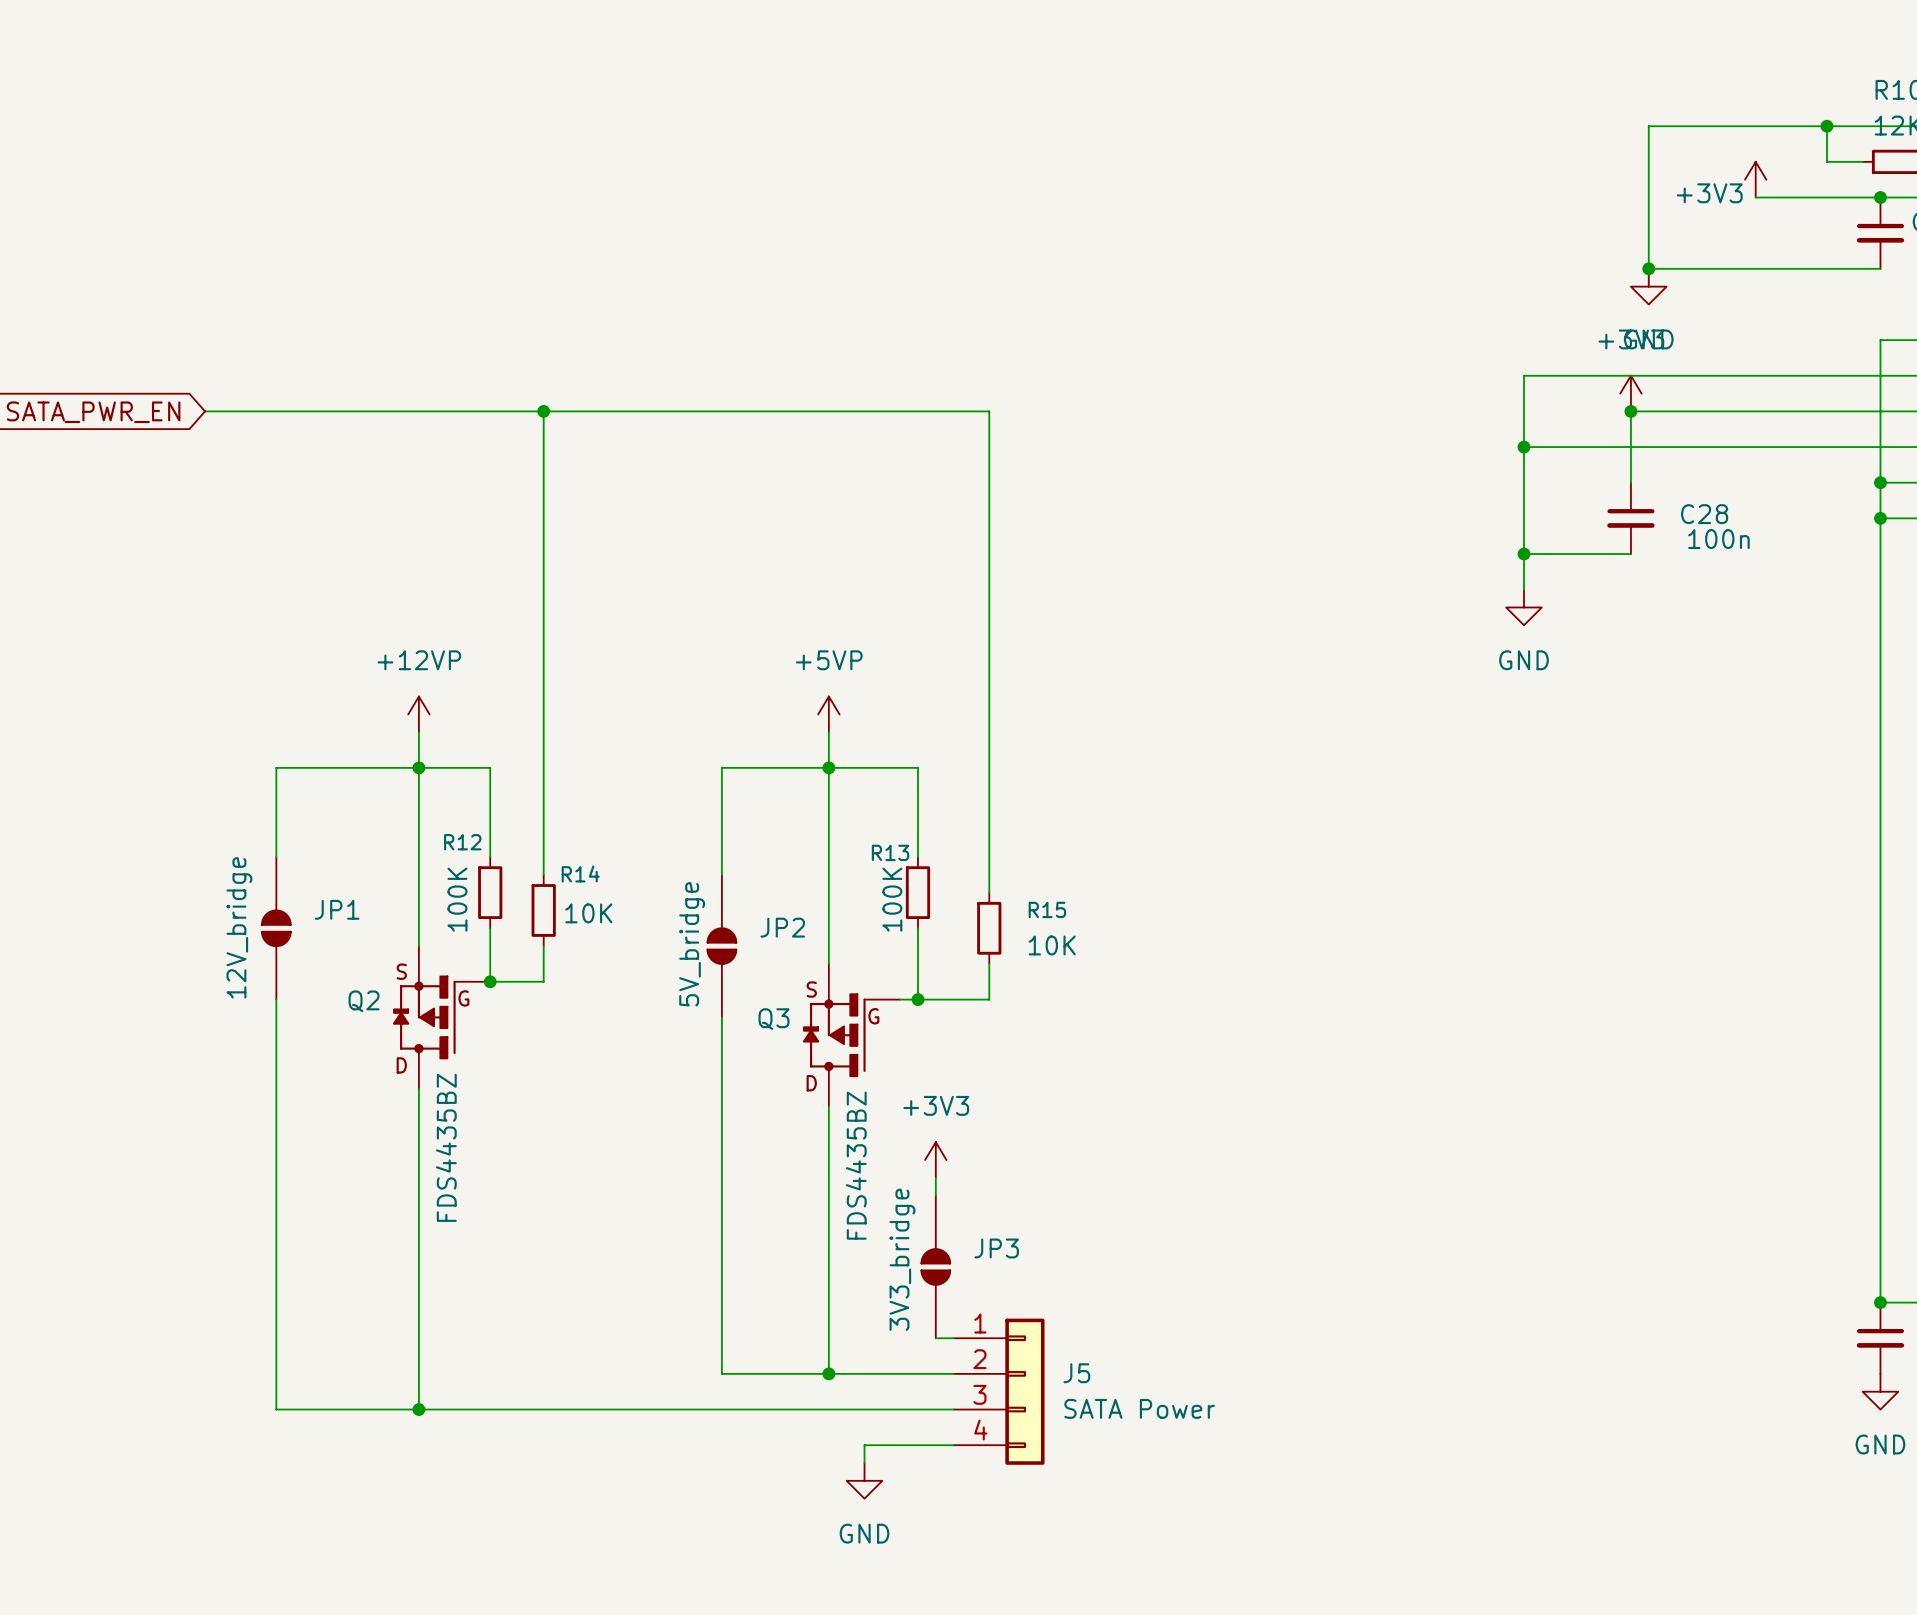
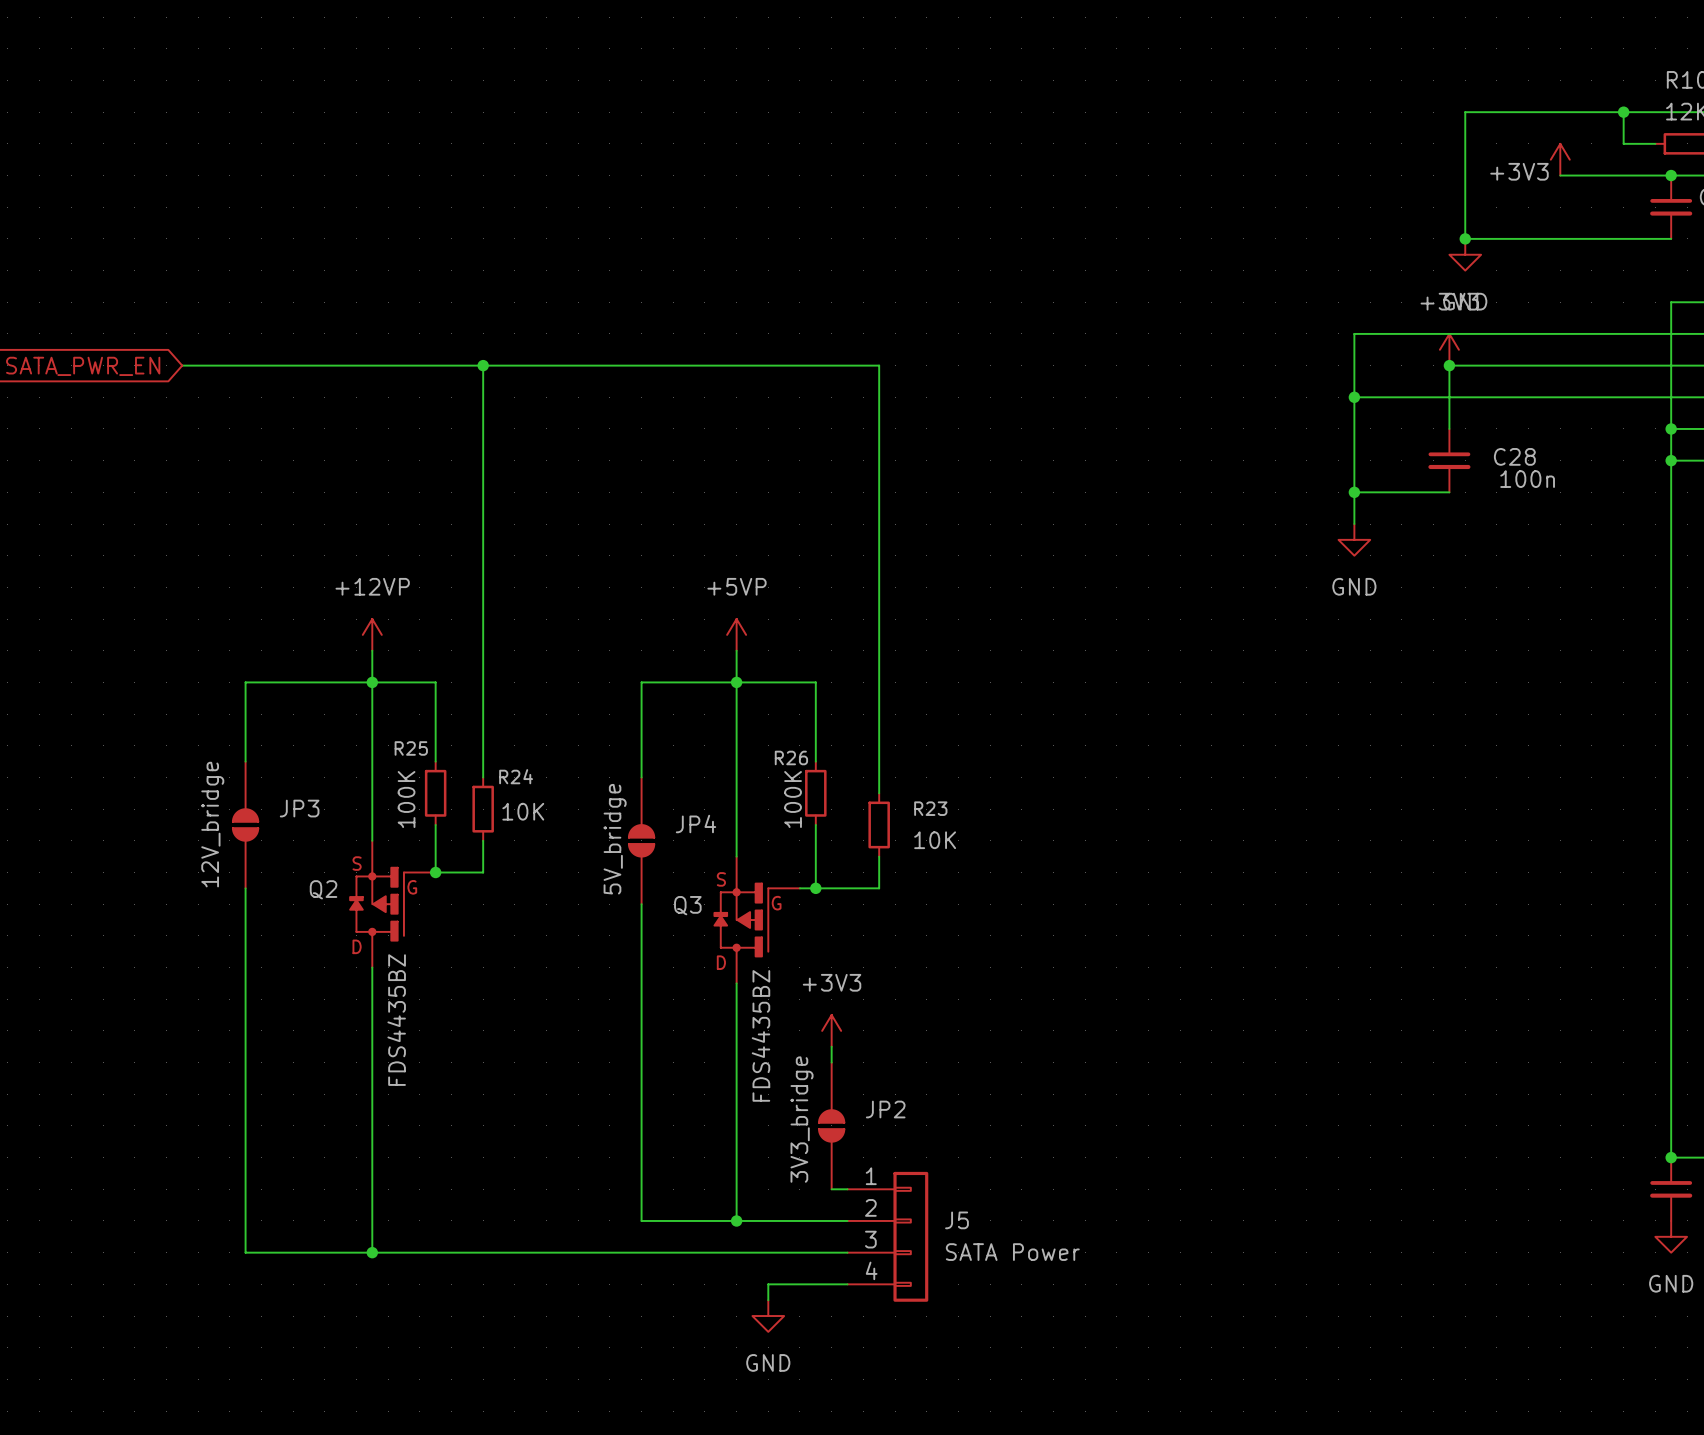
R12 name: R12 (462, 842) -> R25 (411, 748)
R13 name: R13 (890, 852) -> R26 (791, 757)
R14 name: R14 (580, 873) -> R24 (516, 776)
JP1 name: JP1 (337, 909) -> JP3 (299, 808)
R15 name: R15 (1047, 909) -> R23 (930, 808)
JP2 name: JP2 (782, 927) -> JP4 (696, 824)
JP3 name: JP3 (996, 1248) -> JP2 (885, 1109)

